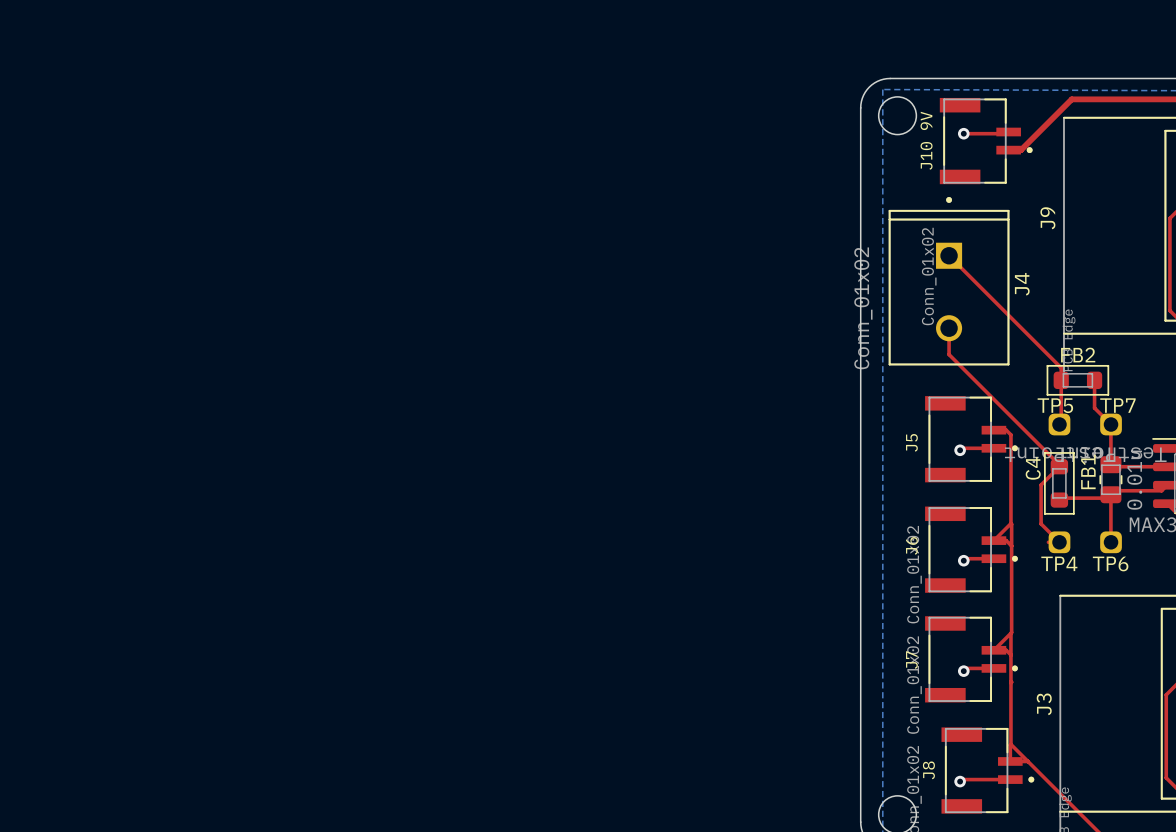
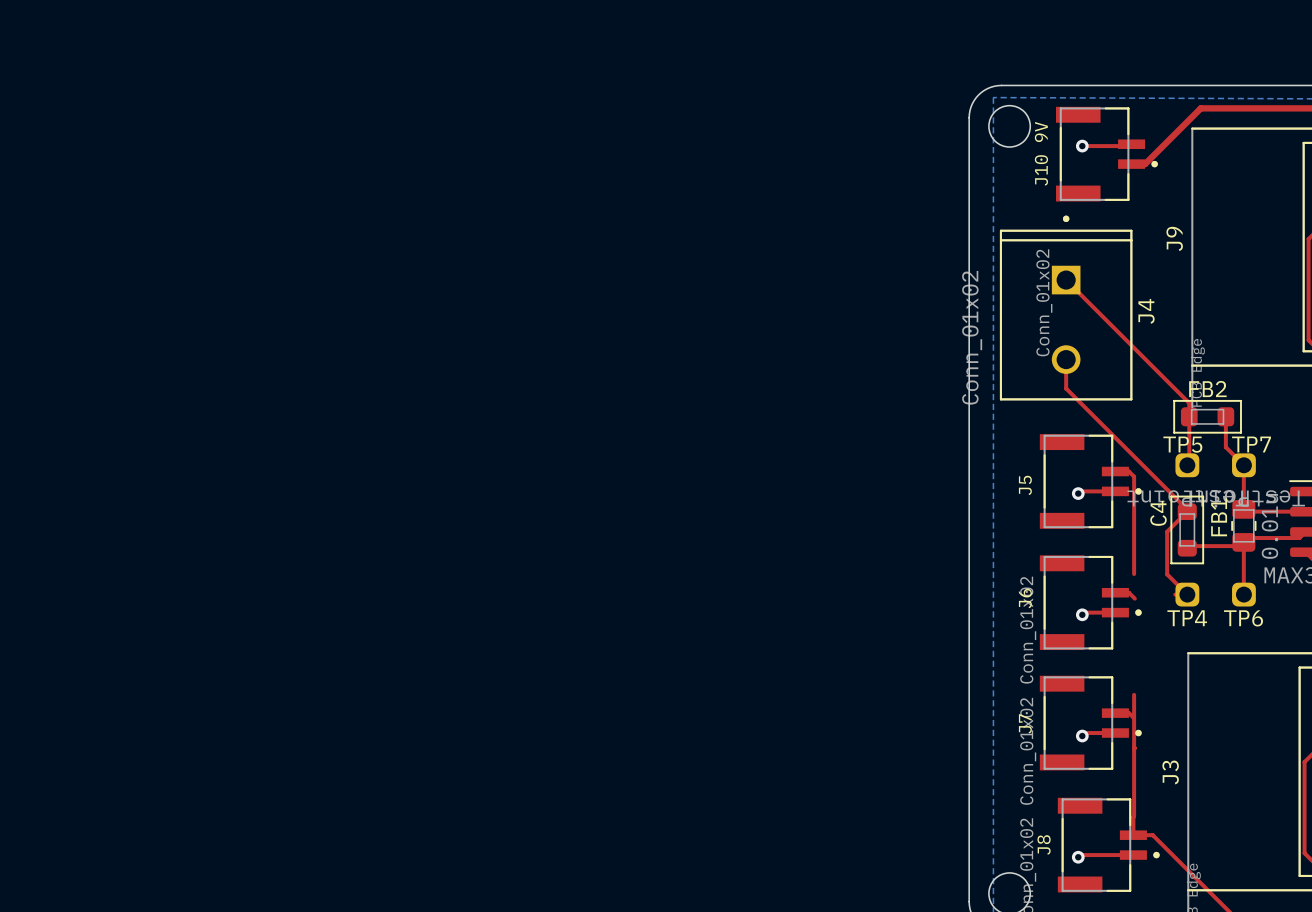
top track: (993, 540) (1011, 524) (1011, 632) (993, 650) -> none
top track: (1010, 744) (1027, 761) -> none

